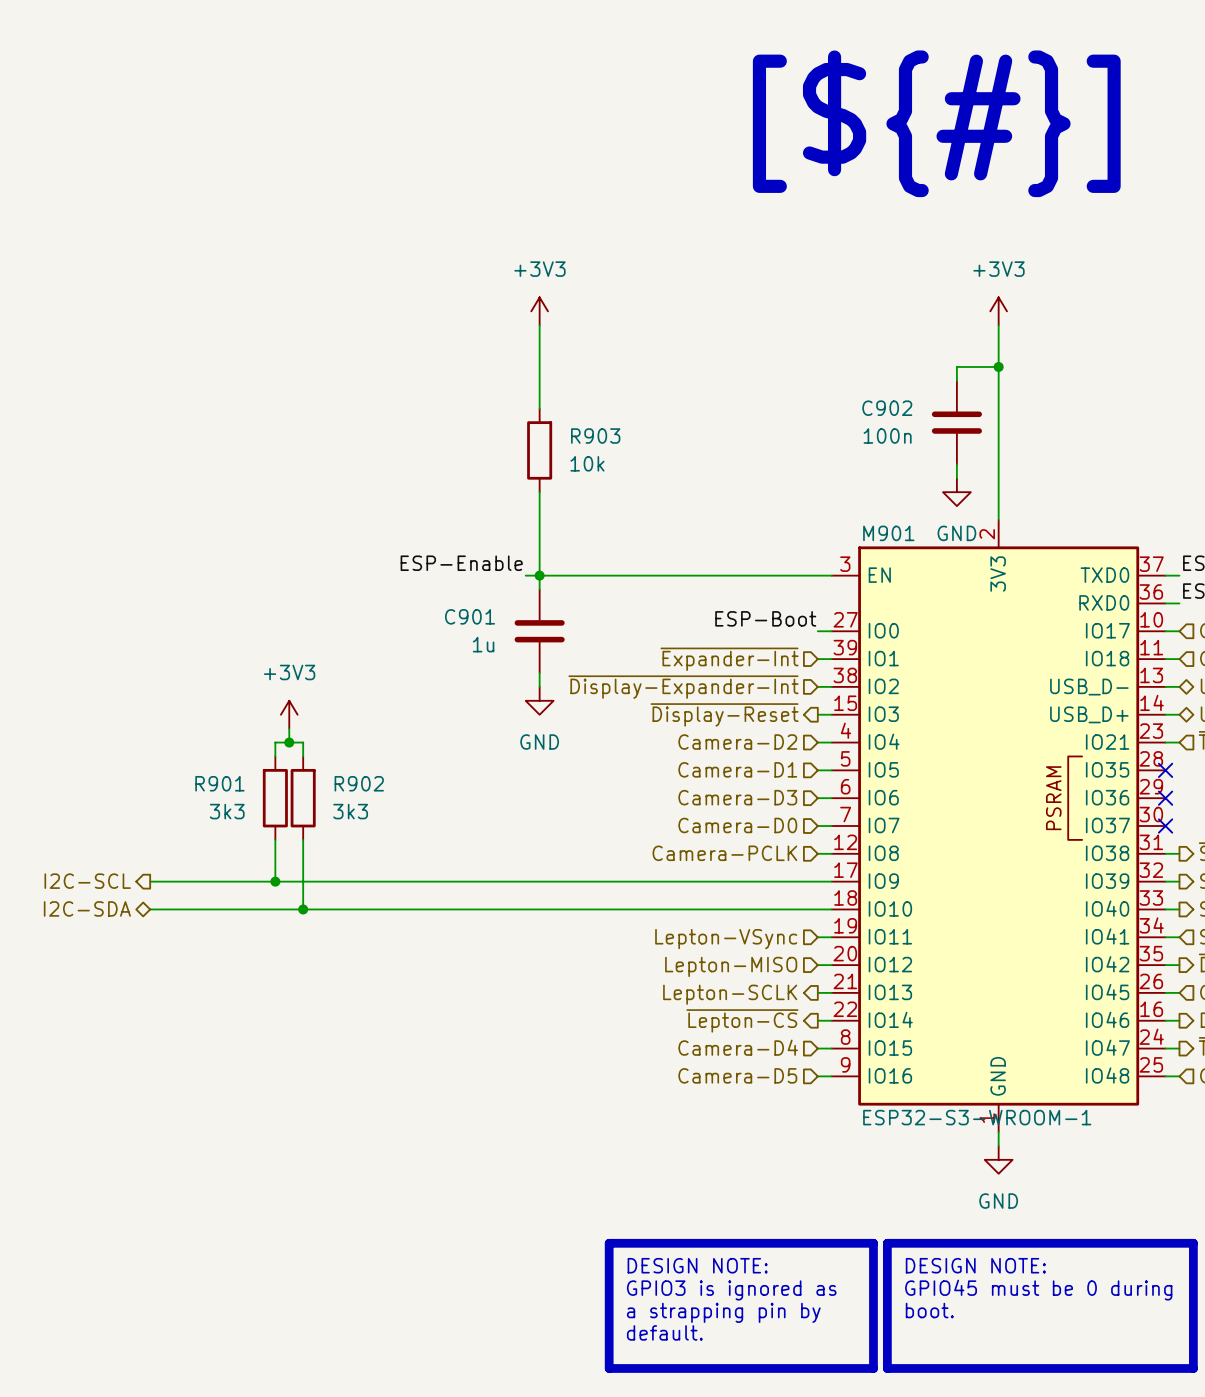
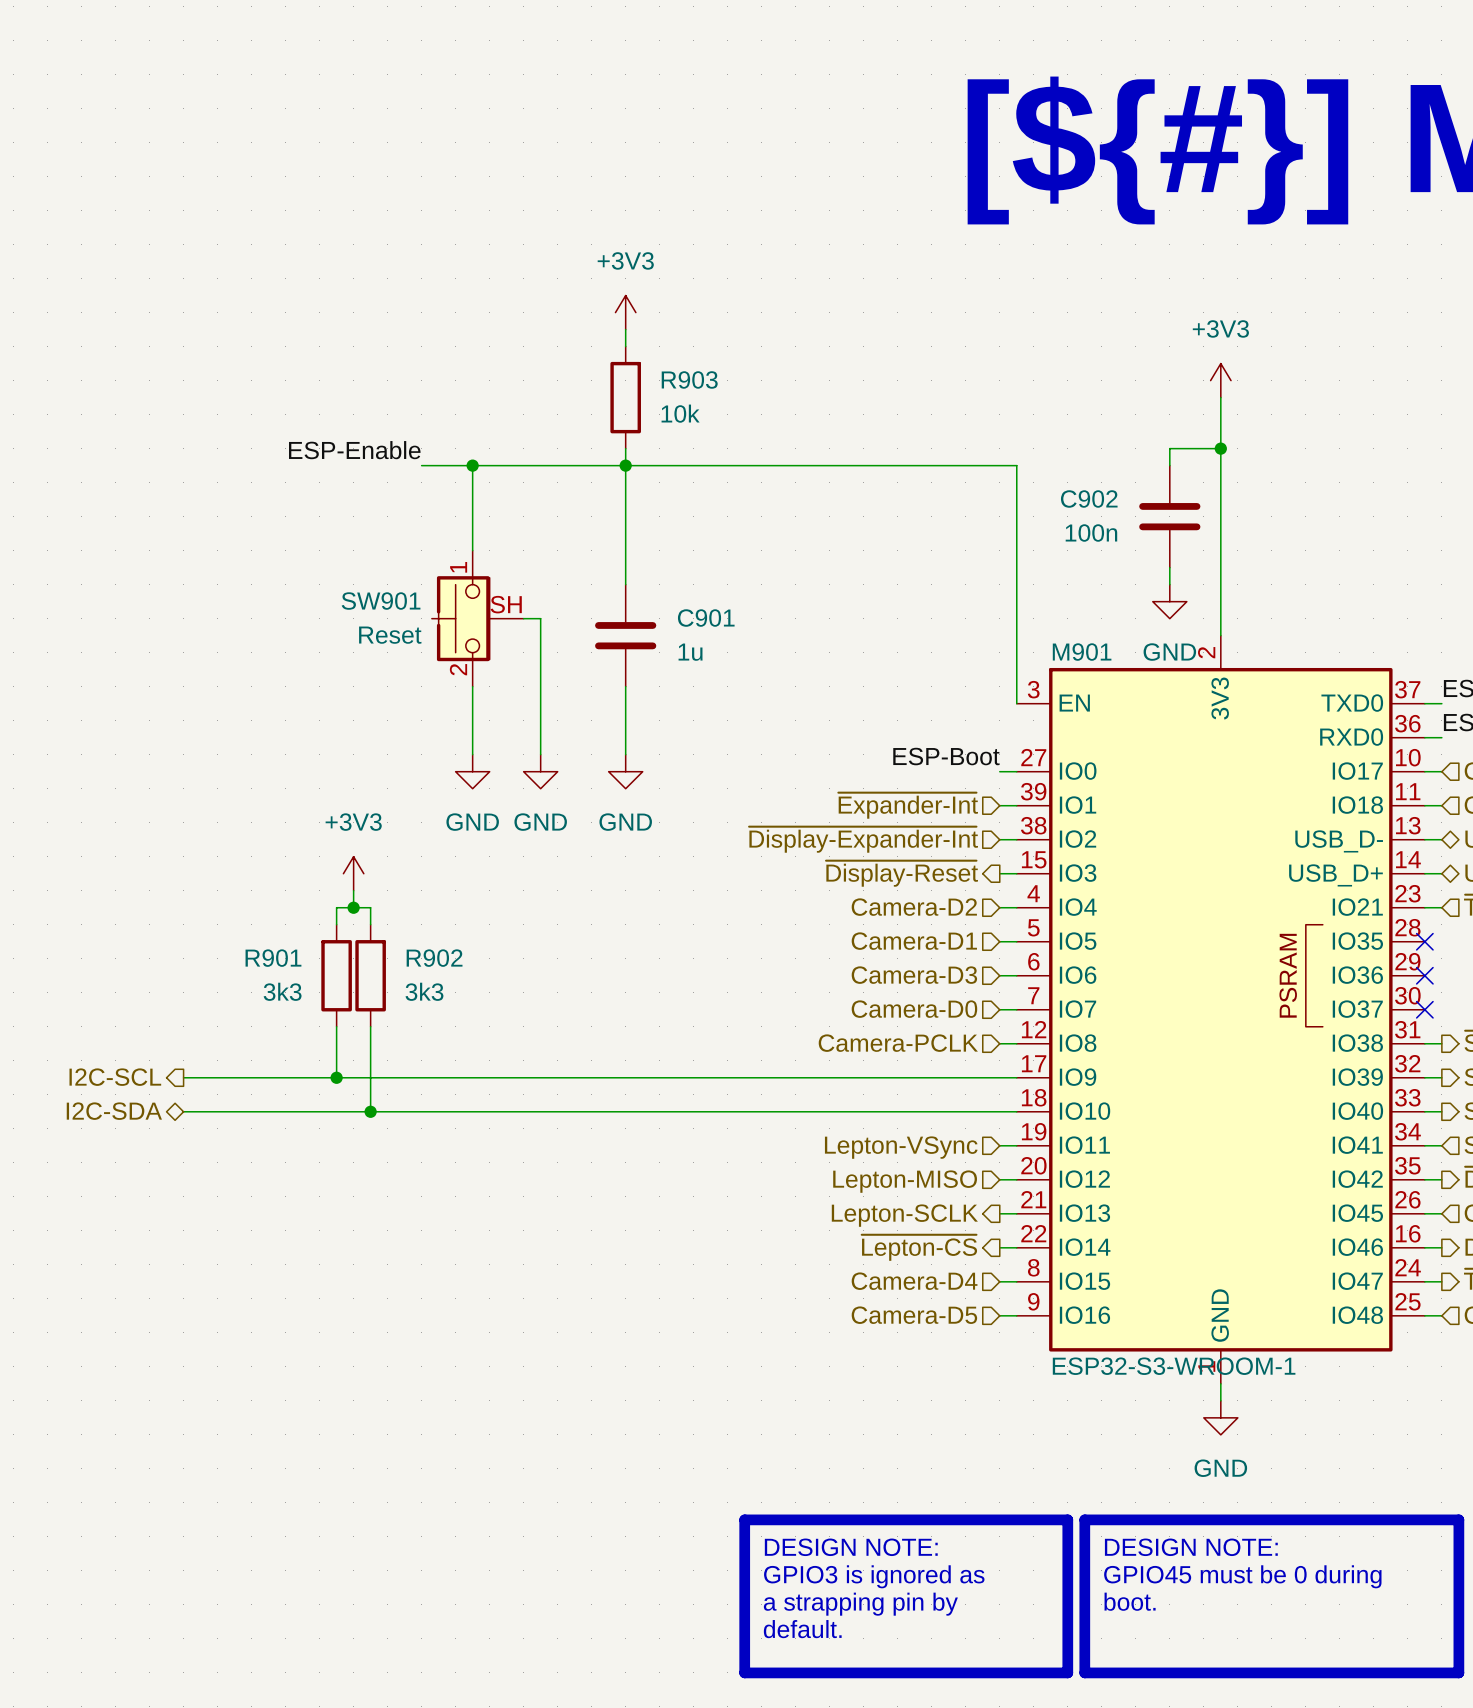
wire: none -> (625, 329) (625, 346)
power symbol position: +3V3 (539, 311) -> +3V3 (625, 312)
wire: (539, 325) (539, 408) -> none
wire: none -> (625, 448) (625, 584)
wire: none -> (472, 465) (472, 550)
junction: none -> (472, 465)
junction: none -> (625, 465)
R903 position: (539, 450) -> (625, 397)
wire: (539, 492) (539, 589) -> none
SW901: none -> Reset (477, 618)
wire: none -> (523, 618) (540, 618) (540, 754)
wire: none -> (472, 686) (472, 754)
wire: none -> (625, 686) (625, 754)
label position: ESP-Enable (461, 563) -> ESP-Enable (354, 450)
wire: (525, 575) (831, 575) -> (421, 465) (1016, 465) (1016, 703)
junction: (539, 575) -> none
C901 name position: C901 (469, 616) -> C901 (706, 618)
power symbol: none -> GND (472, 771)
power symbol: none -> GND (540, 771)
power symbol: none -> GND (625, 771)
C901 position: (539, 631) -> (625, 635)
C901 value position: 1u (483, 644) -> 1u (690, 652)
wire: (539, 673) (539, 686) -> none
power symbol: GND (539, 700) -> none

